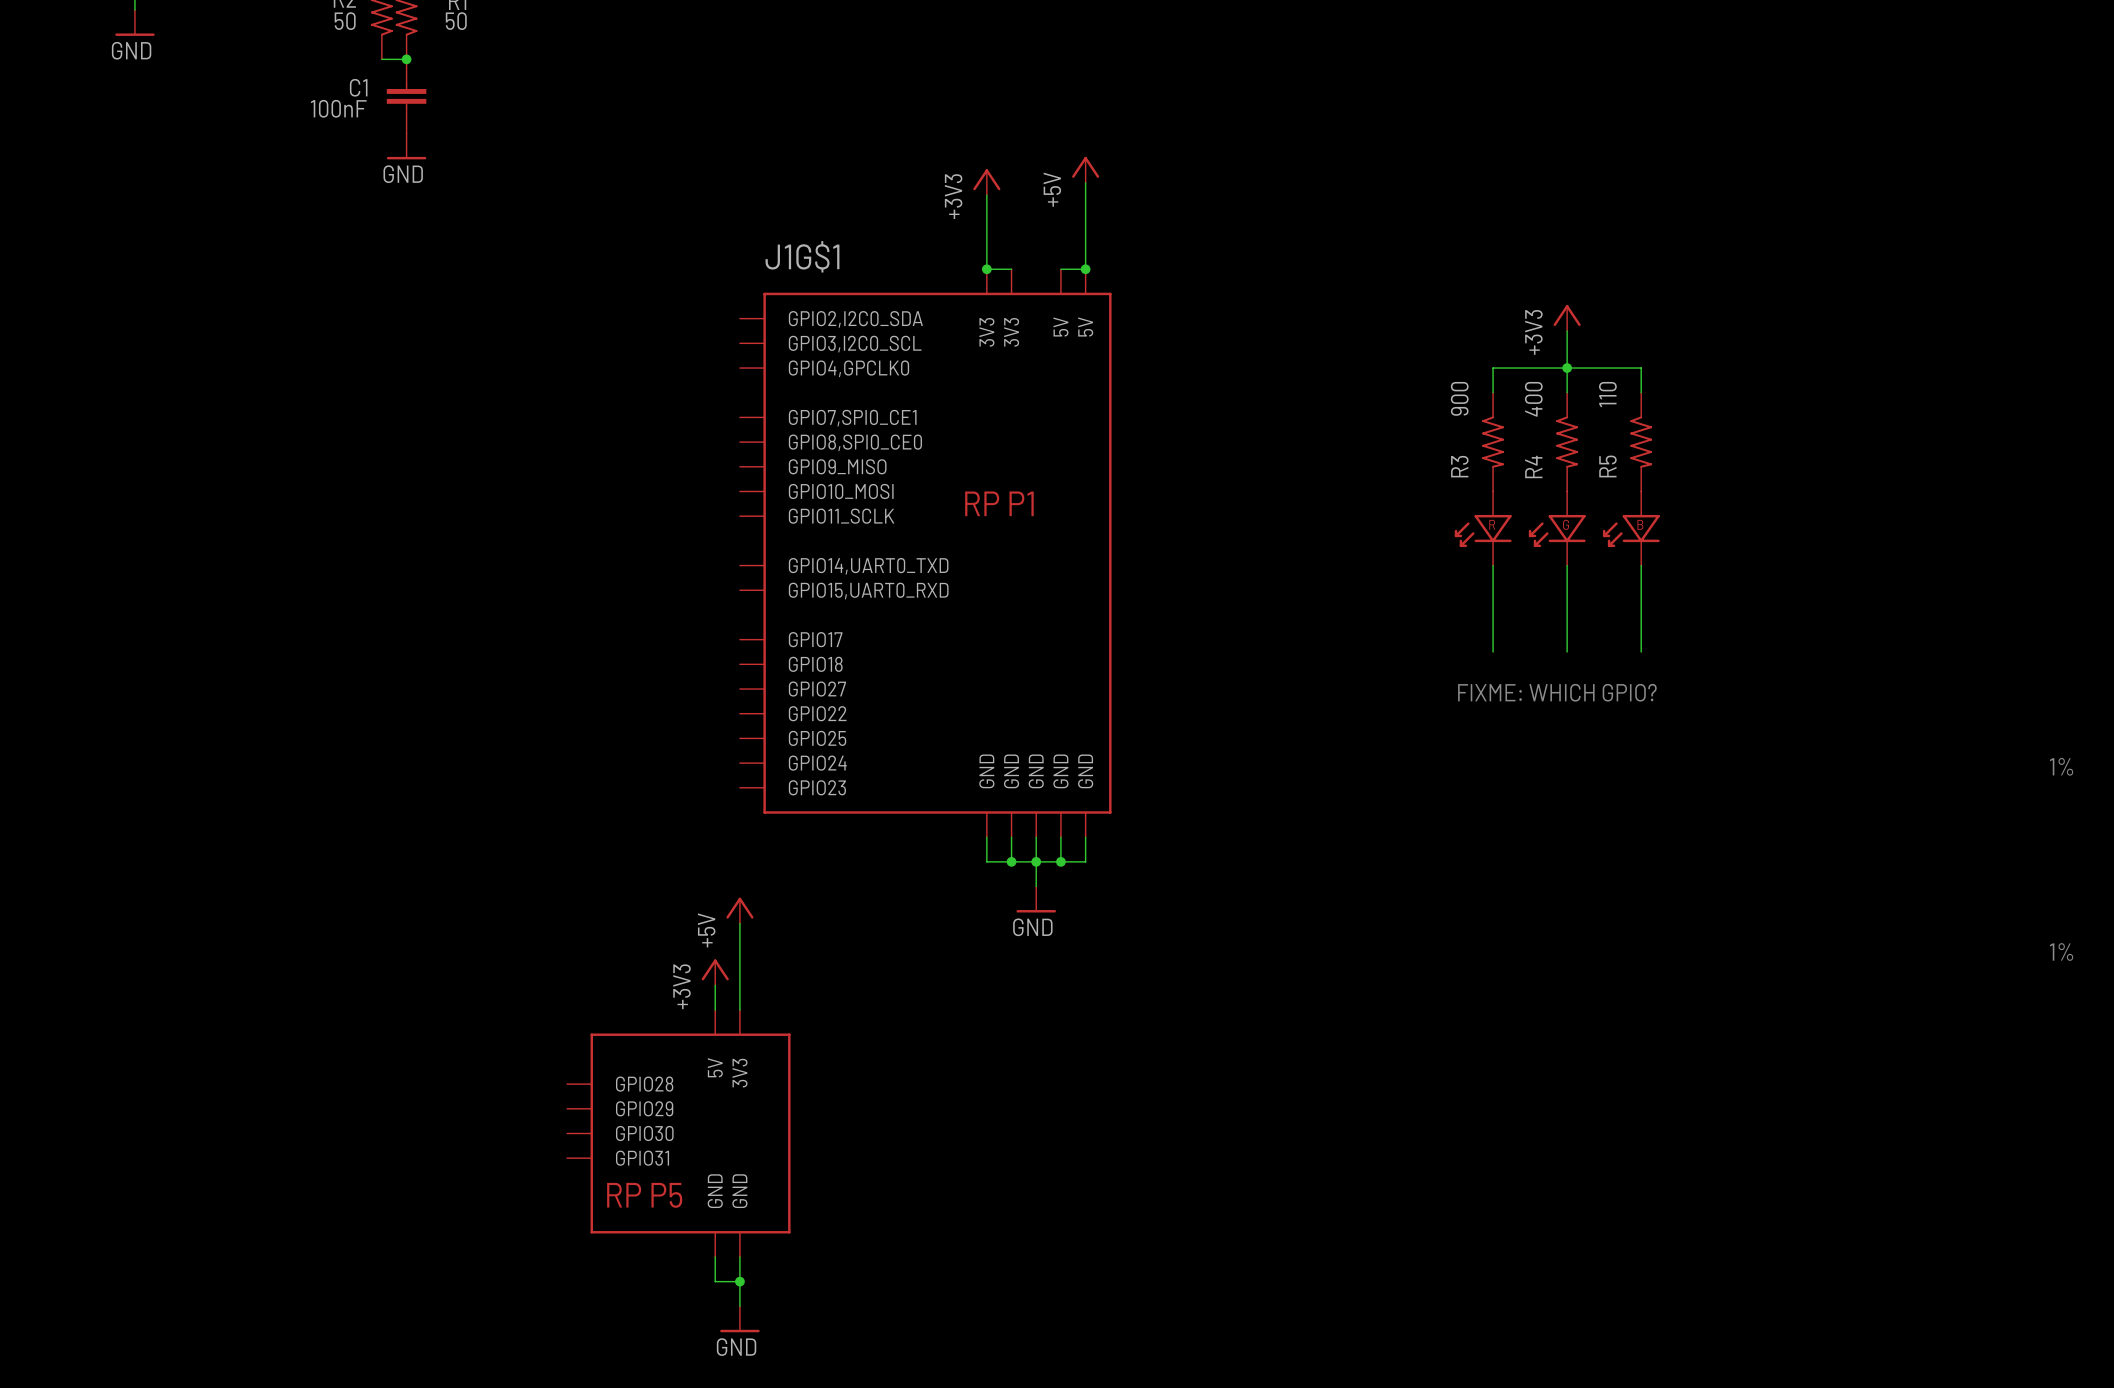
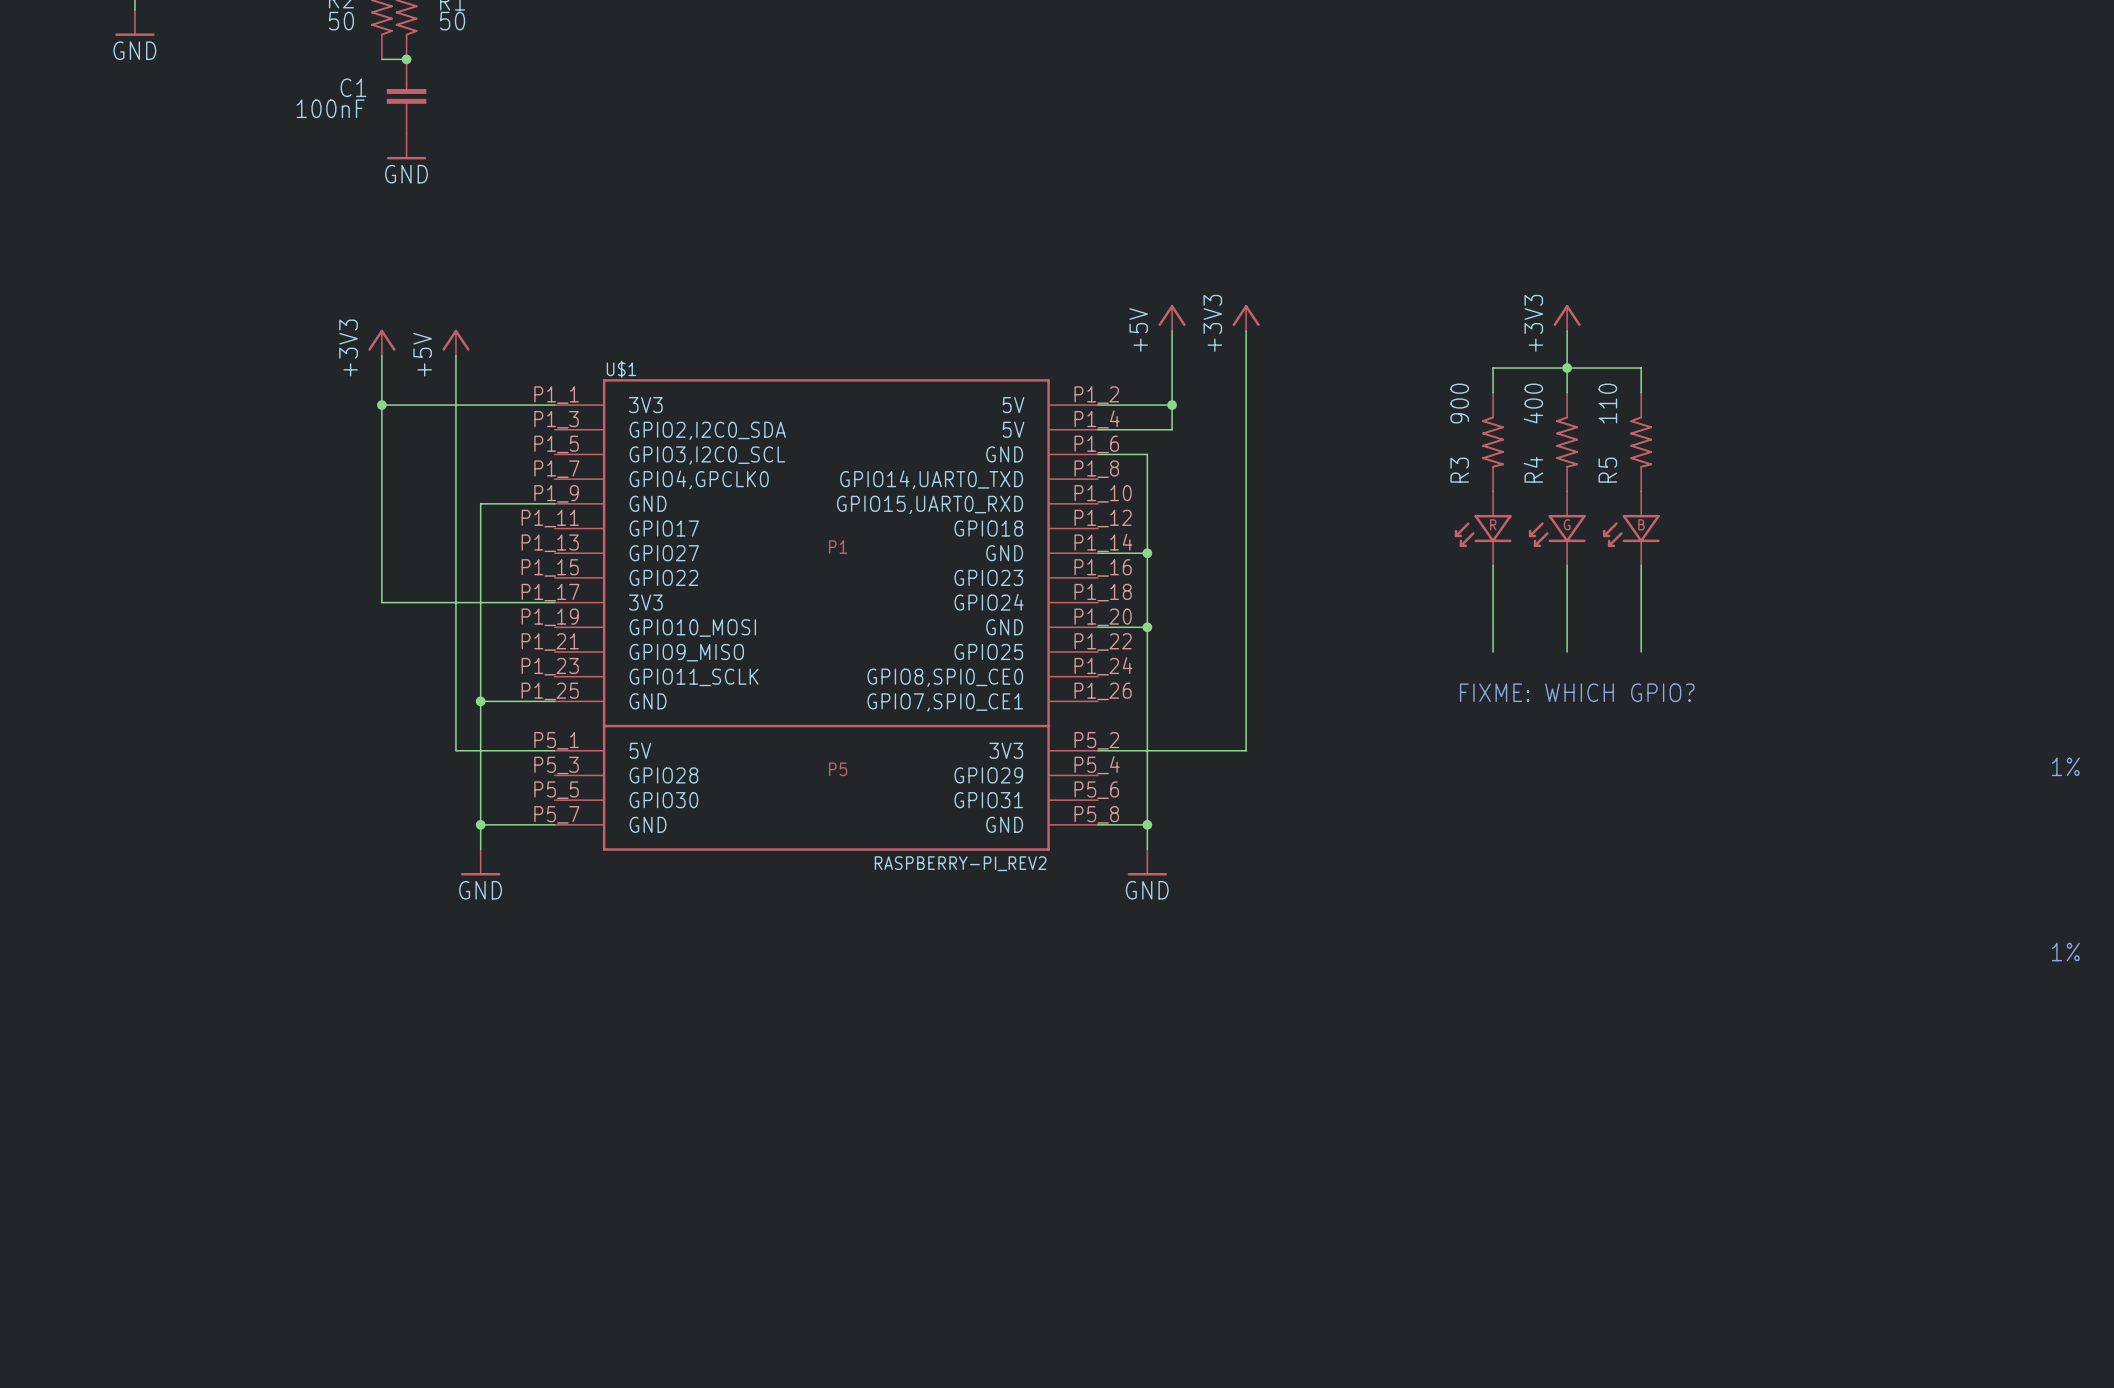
power symbol position: +5V (1085, 169) -> +5V (1172, 318)
power symbol: +3V3 (986, 182) -> none
wire: (1085, 182) (1085, 269) (1060, 269) -> none
wire: (986, 195) (986, 269) (1011, 269) -> none
junction: (986, 269) -> none
junction: (1085, 269) -> none
power symbol: none -> +3V3 (1246, 318)
wire: none -> (1172, 330) (1172, 429) (1097, 429)
wire: none -> (1246, 330) (1246, 750) (1097, 750)
power symbol: none -> +3V3 (381, 342)
power symbol: none -> +5V (455, 342)
wire: none -> (381, 355) (381, 602) (554, 602)
wire: none -> (455, 355) (455, 750) (554, 750)
wire: none -> (381, 405) (554, 405)
junction: none -> (381, 405)
wire: none -> (1097, 405) (1172, 405)
junction: none -> (1172, 405)
wire: none -> (1097, 454) (1147, 454) (1147, 849)
wire: none -> (554, 503) (480, 503) (480, 849)
J1G$1: (925, 553) -> none
wire: none -> (1097, 553) (1147, 553)
junction: none -> (1147, 553)
U$1: none -> RASPBERRY-PI_REV2 (826, 614)
wire: none -> (1097, 627) (1147, 627)
junction: none -> (1147, 627)
wire: none -> (480, 701) (554, 701)
junction: none -> (480, 701)
wire: none -> (480, 824) (554, 824)
junction: none -> (480, 824)
wire: none -> (1097, 824) (1147, 824)
junction: none -> (1147, 824)
wire: (986, 837) (986, 861) (1085, 861) (1085, 837) -> none
wire: (1011, 837) (1011, 861) -> none
wire: (1036, 837) (1036, 886) -> none
wire: (1060, 837) (1060, 861) -> none
junction: (1011, 861) -> none
junction: (1036, 861) -> none
junction: (1060, 861) -> none
power symbol: none -> GND (480, 862)
power symbol position: GND (1036, 899) -> GND (1147, 862)
power symbol: +5V (739, 910) -> none
wire: (739, 923) (739, 1010) -> none
power symbol: +3V3 (715, 972) -> none
wire: (715, 985) (715, 1010) -> none
part: (678, 1133) -> none
wire: (715, 1256) (715, 1281) (739, 1281) -> none
wire: (739, 1256) (739, 1306) -> none
junction: (739, 1281) -> none
power symbol: GND (739, 1319) -> none

